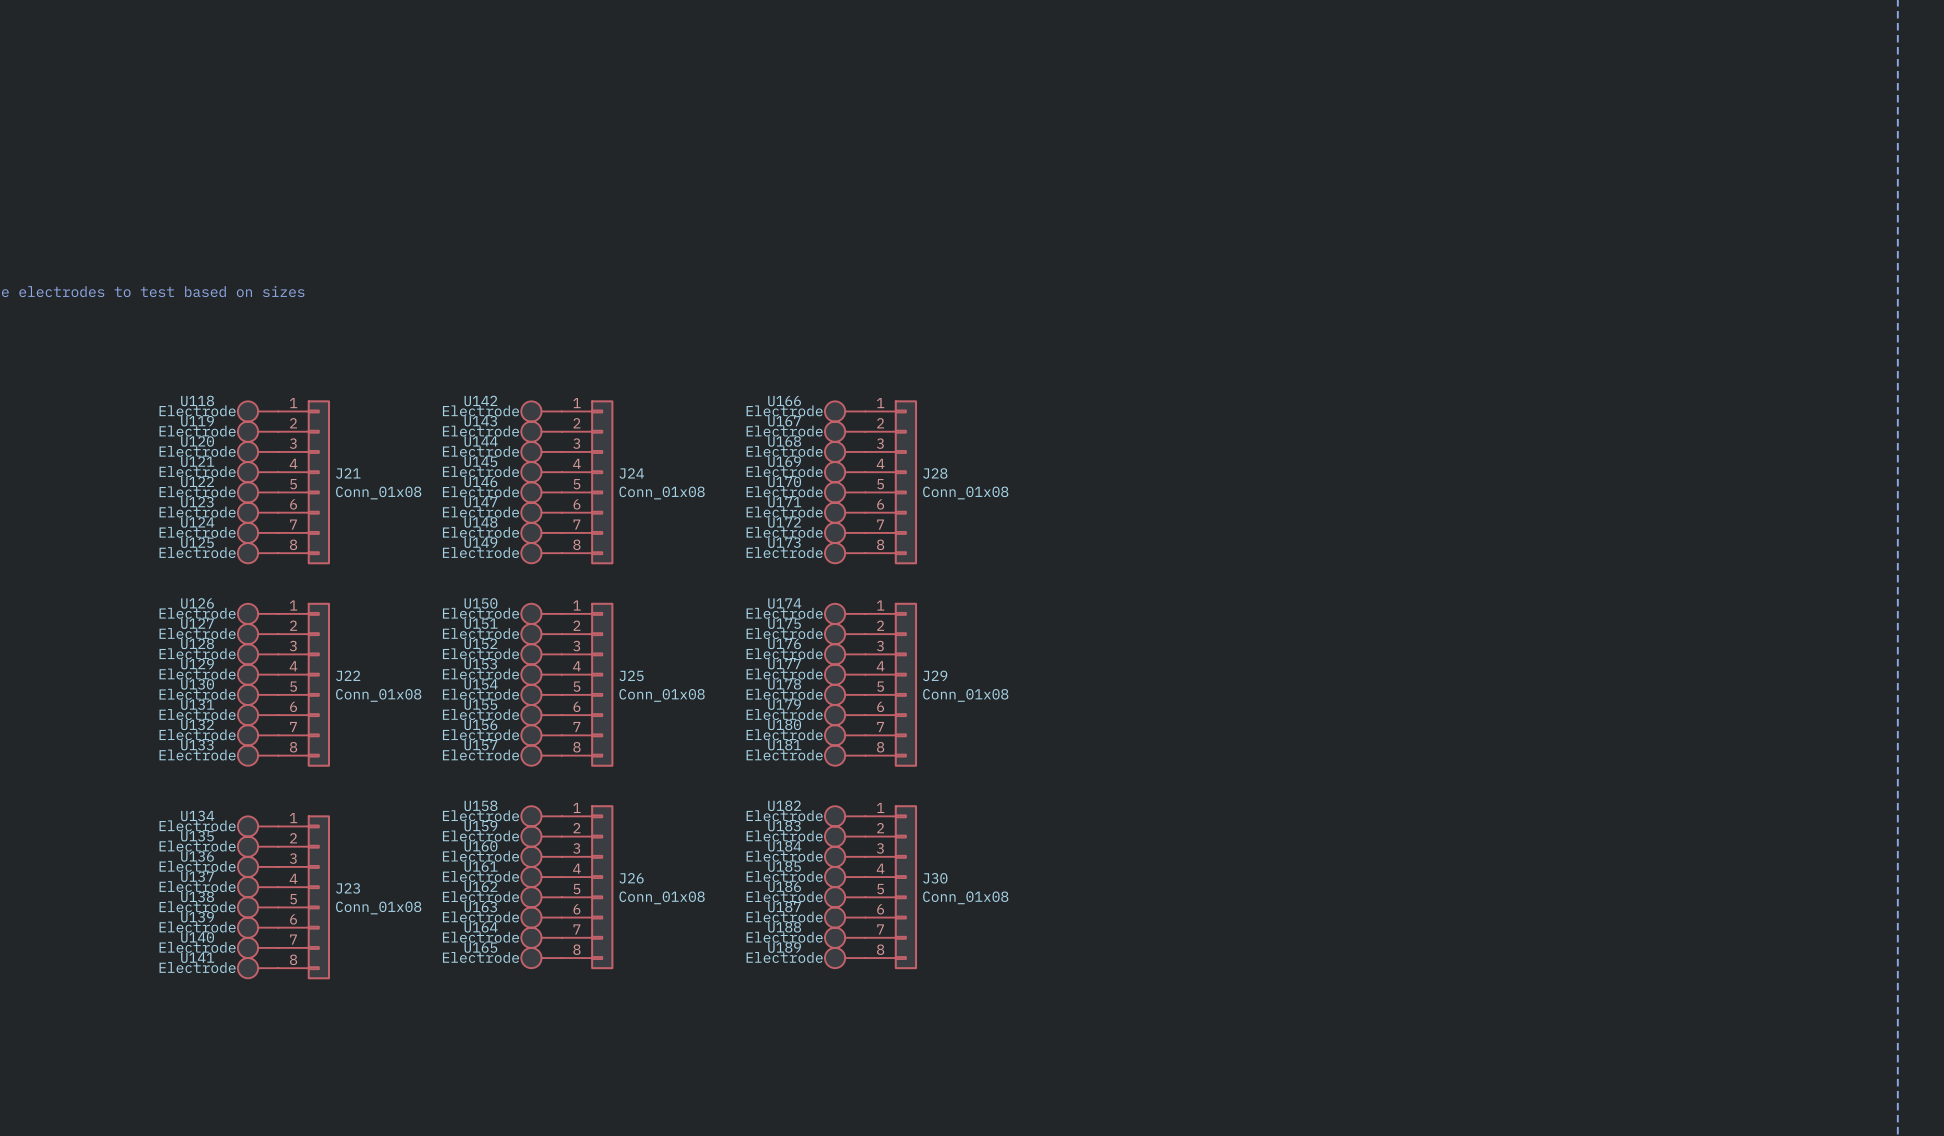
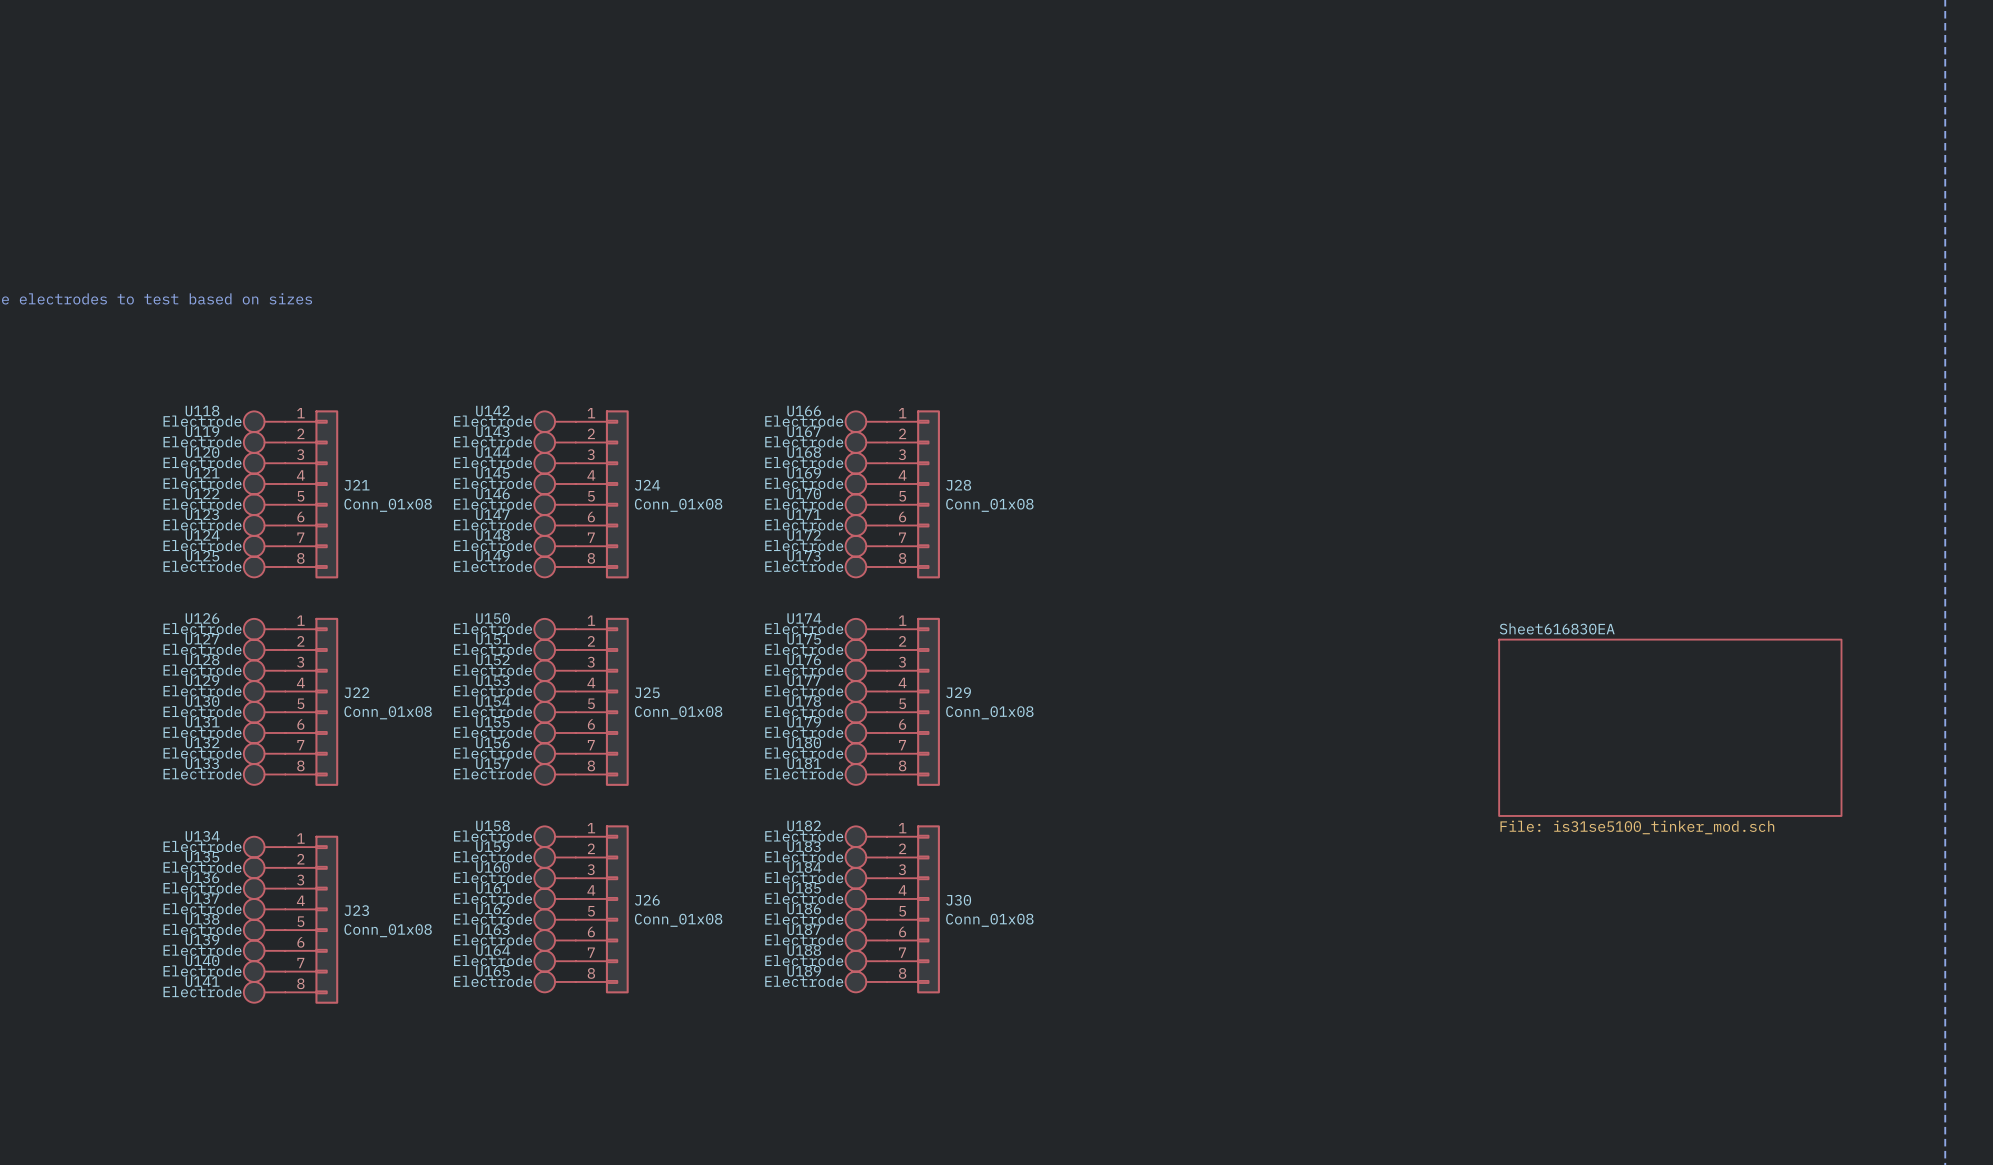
sheet Sheet616830EA: none -> File: is31se5100_tinker_mod.sch (1670, 727)

